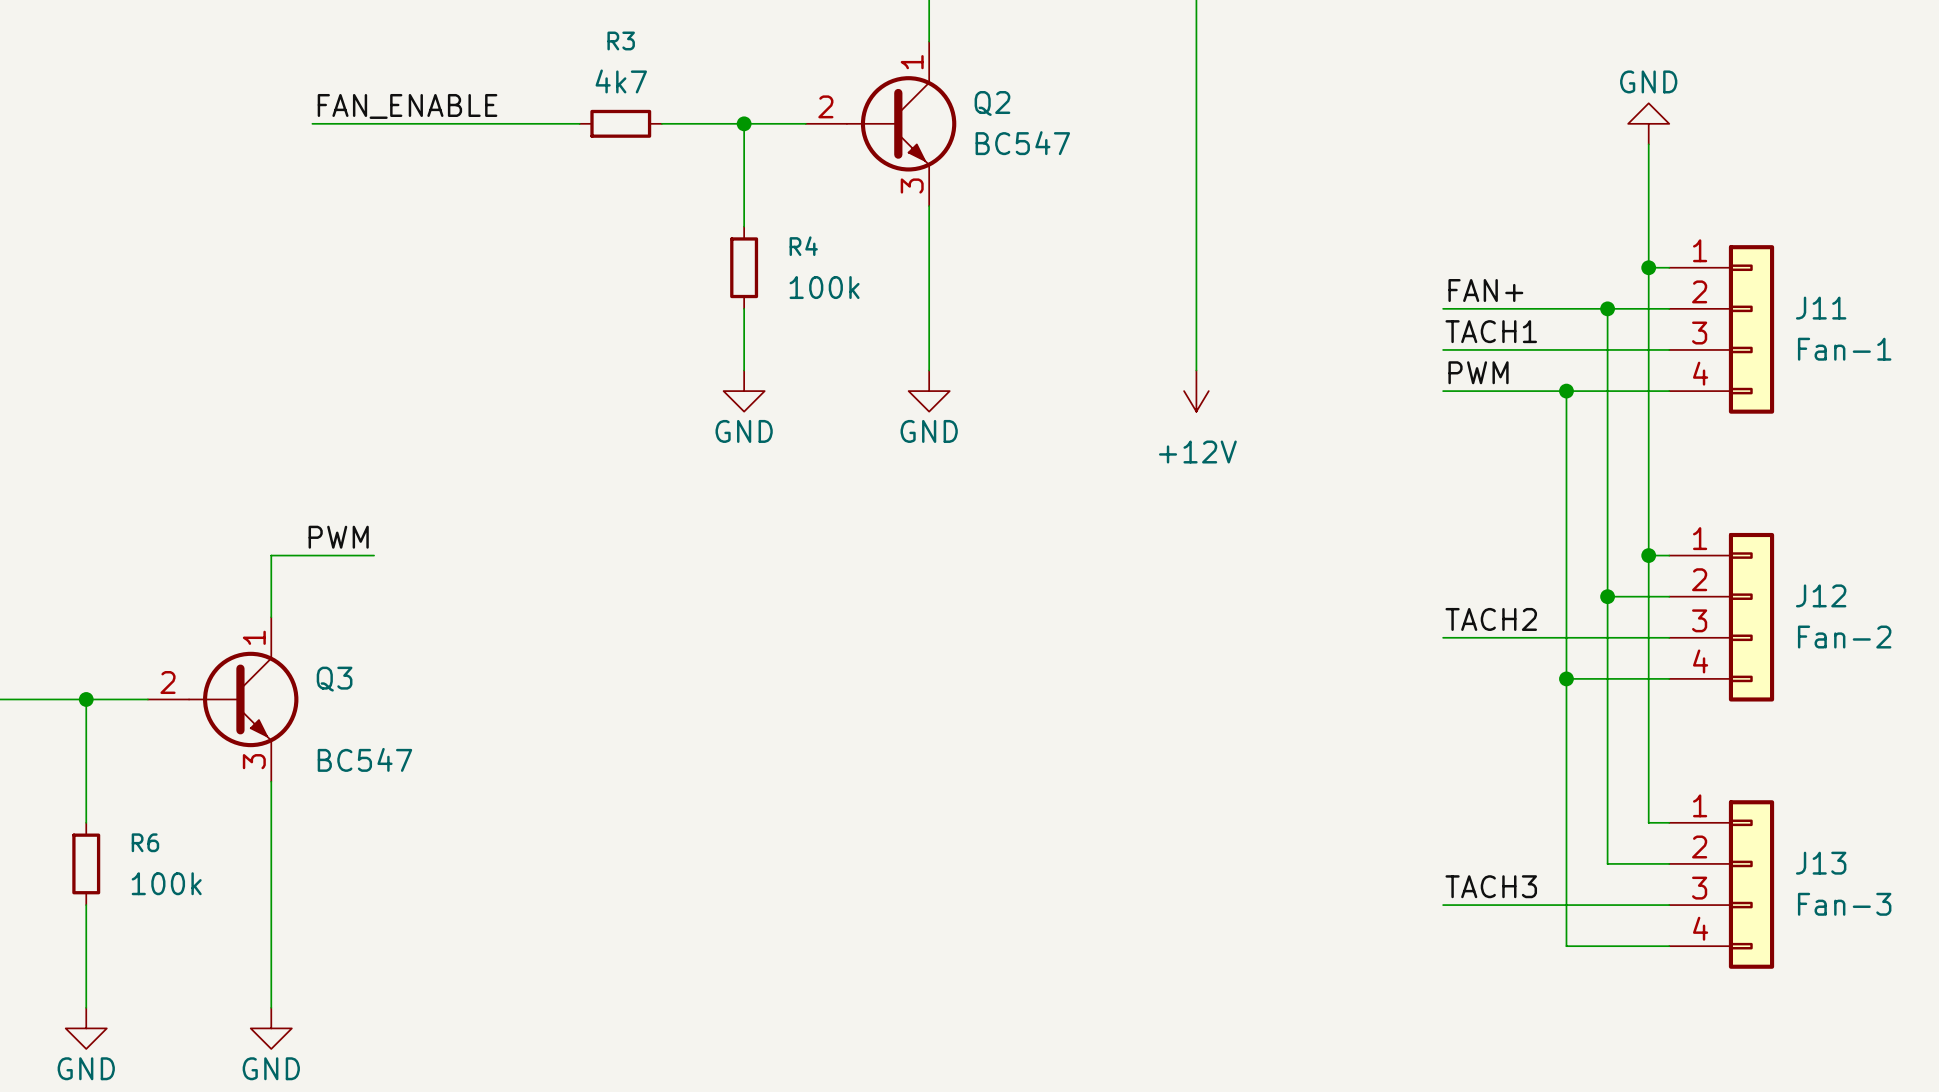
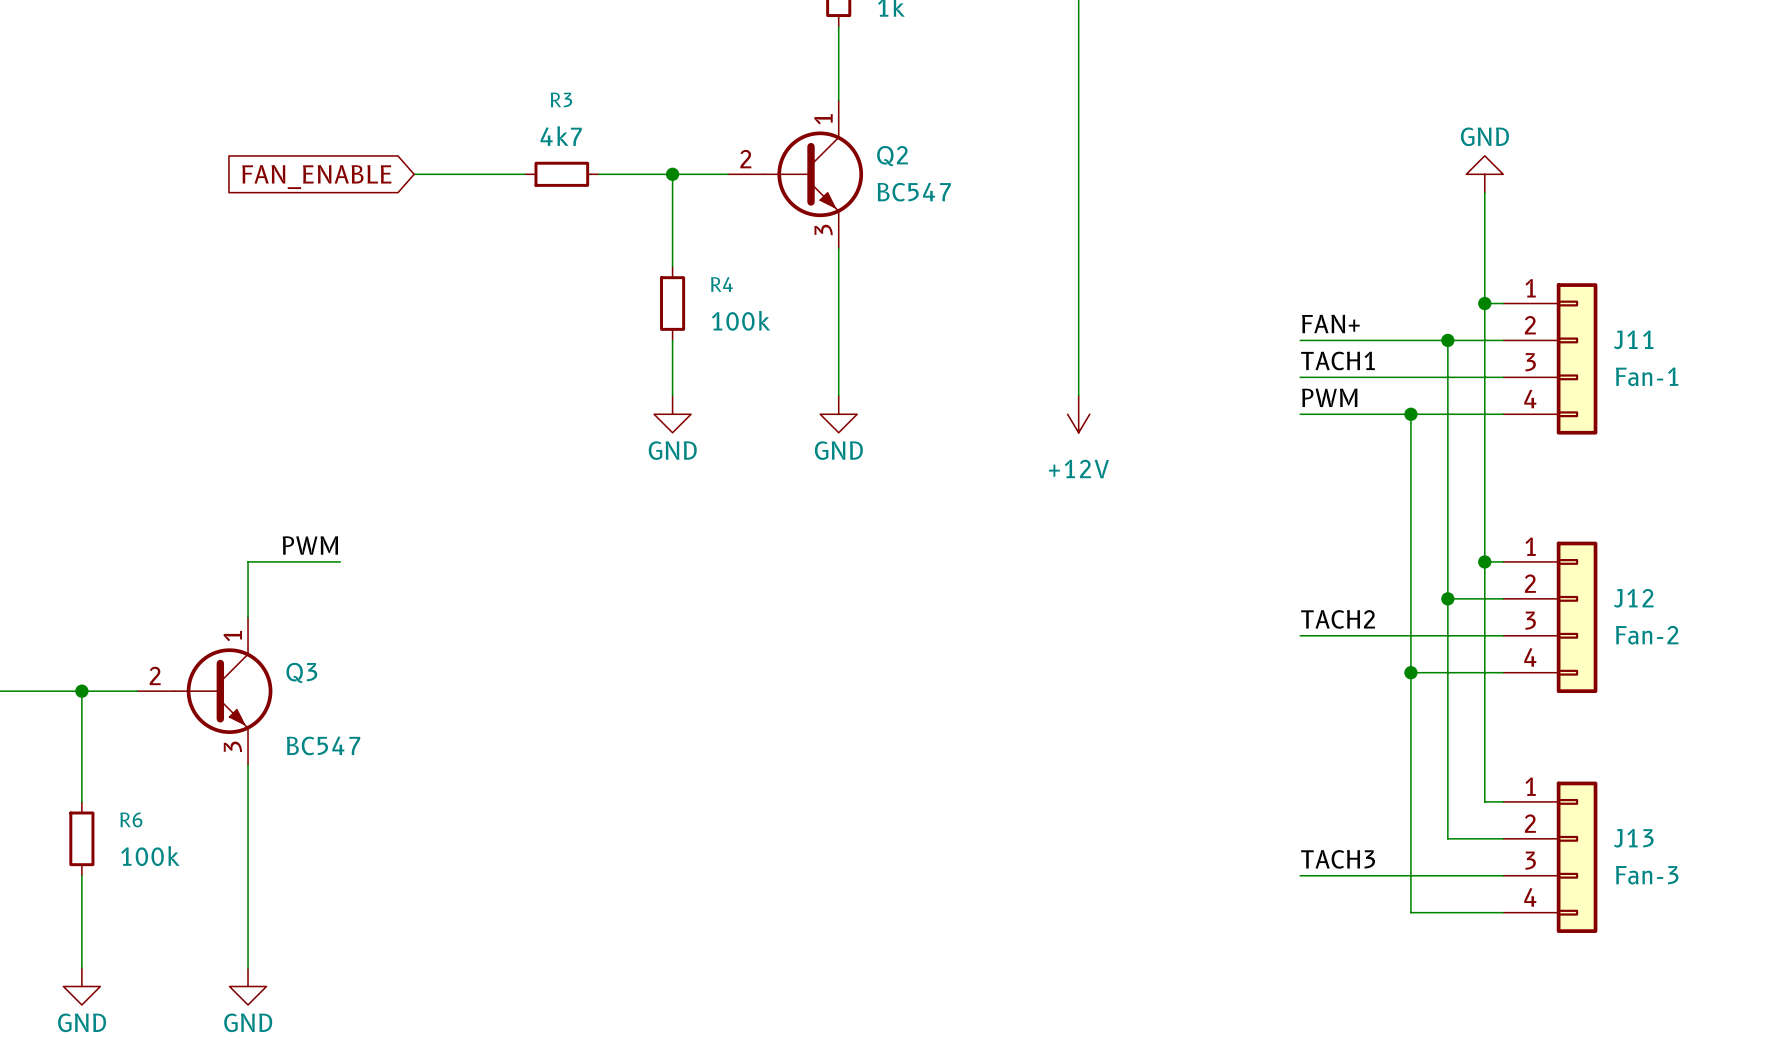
label: FAN_ENABLE (407, 106) -> none
wire: (312, 123) (456, 123) -> none
global label: none -> FAN_ENABLE (316, 177)

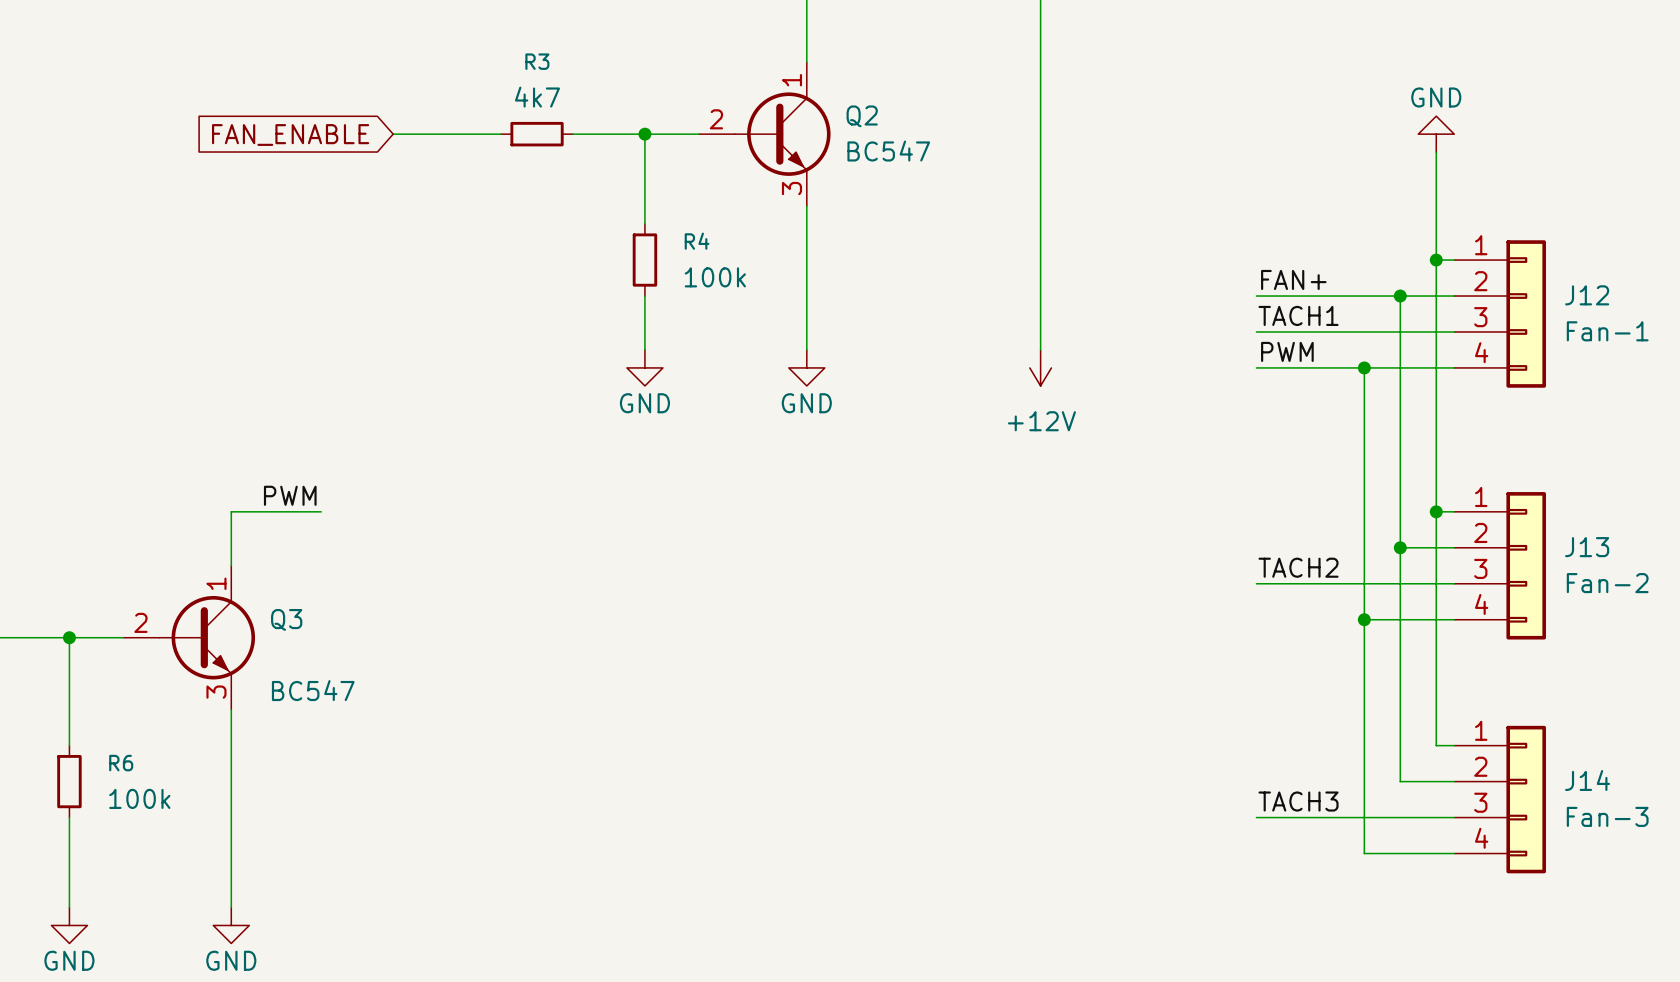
J11 name: J11 (1633, 339) -> J12 (1587, 295)
J12 name: J12 (1633, 598) -> J13 (1587, 547)
J13 name: J13 (1633, 838) -> J14 (1587, 780)

